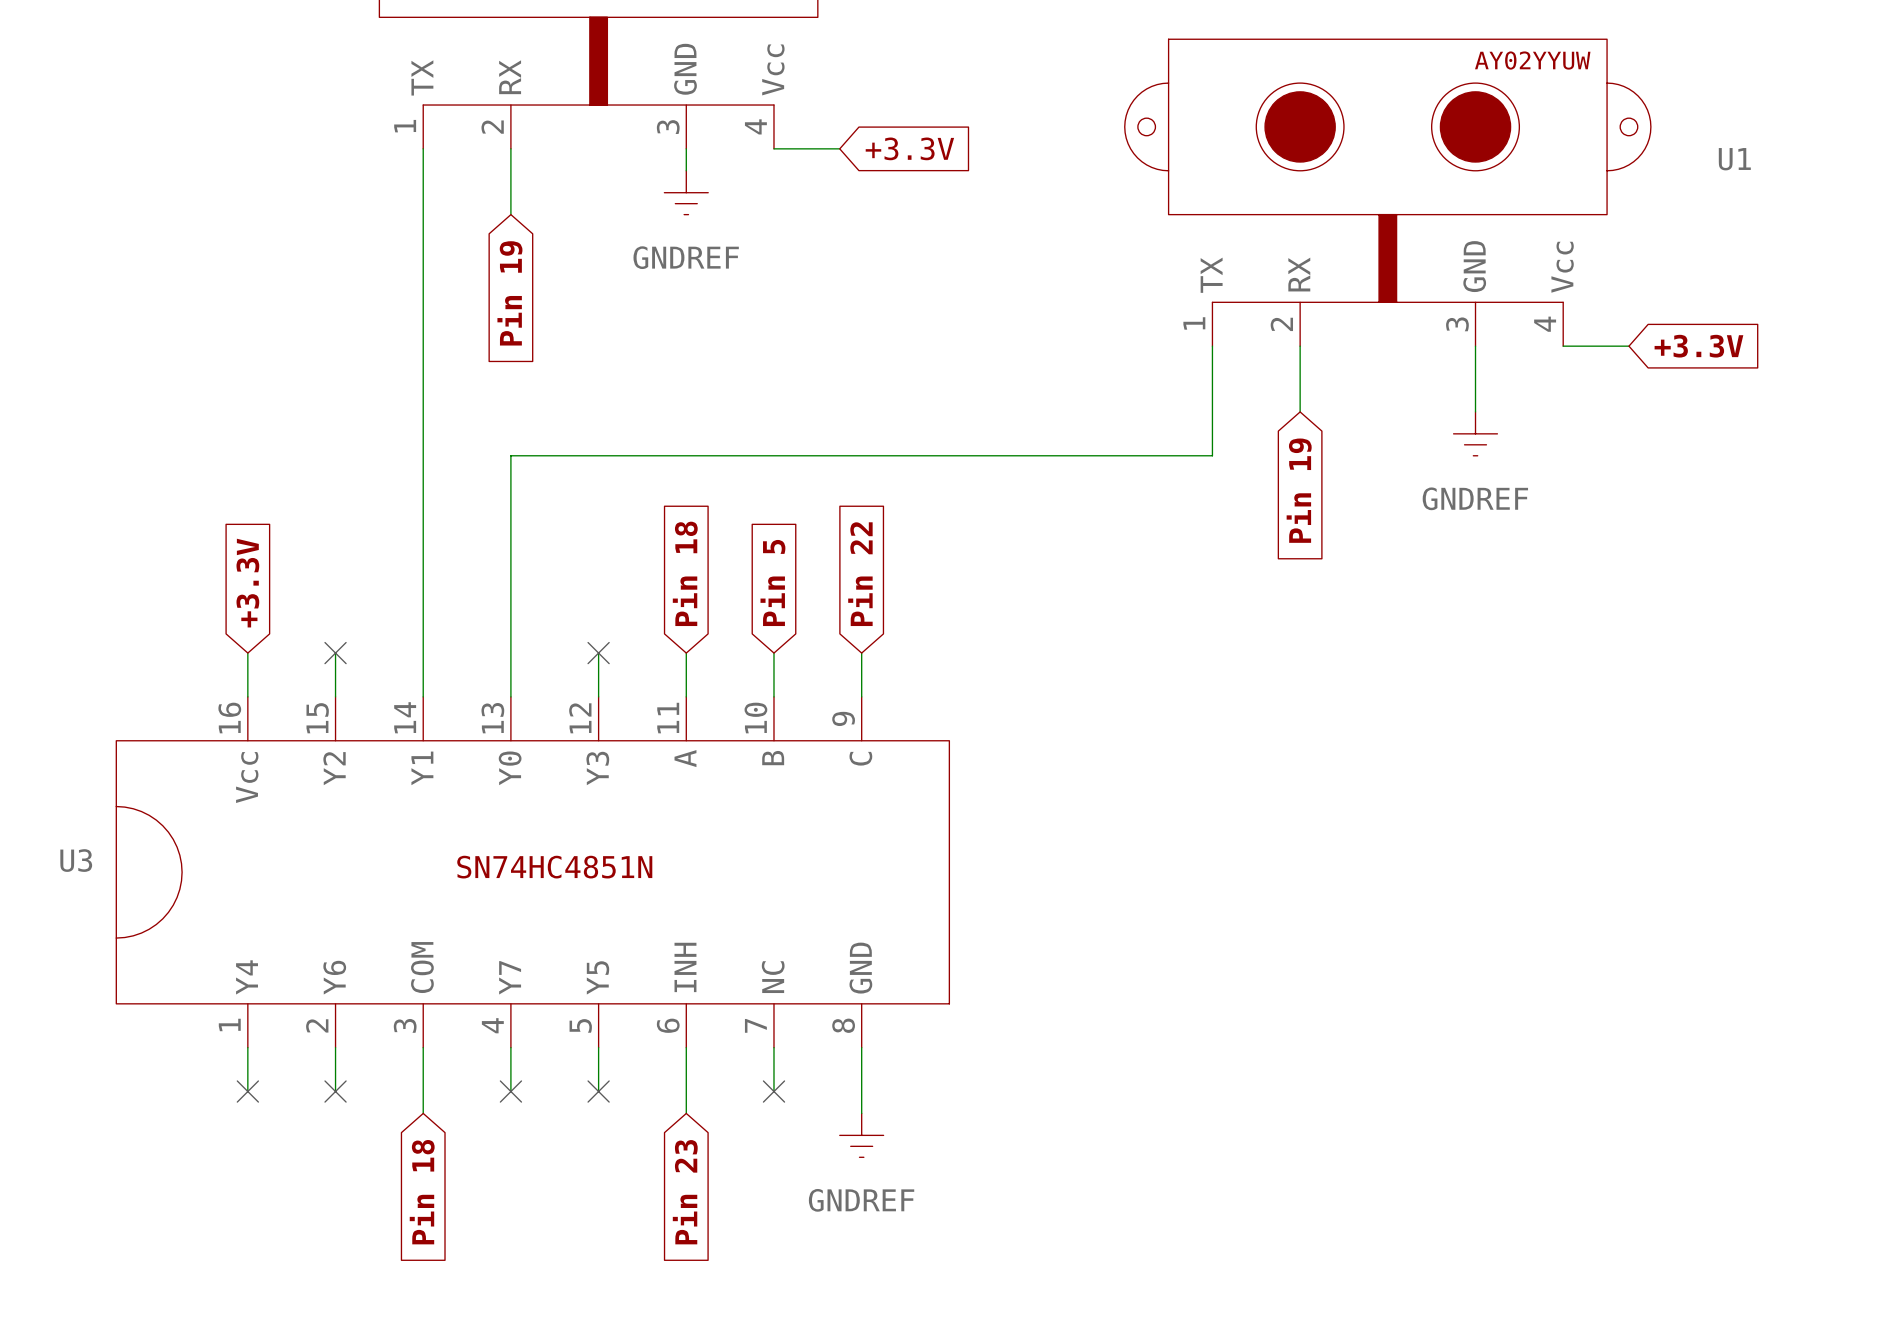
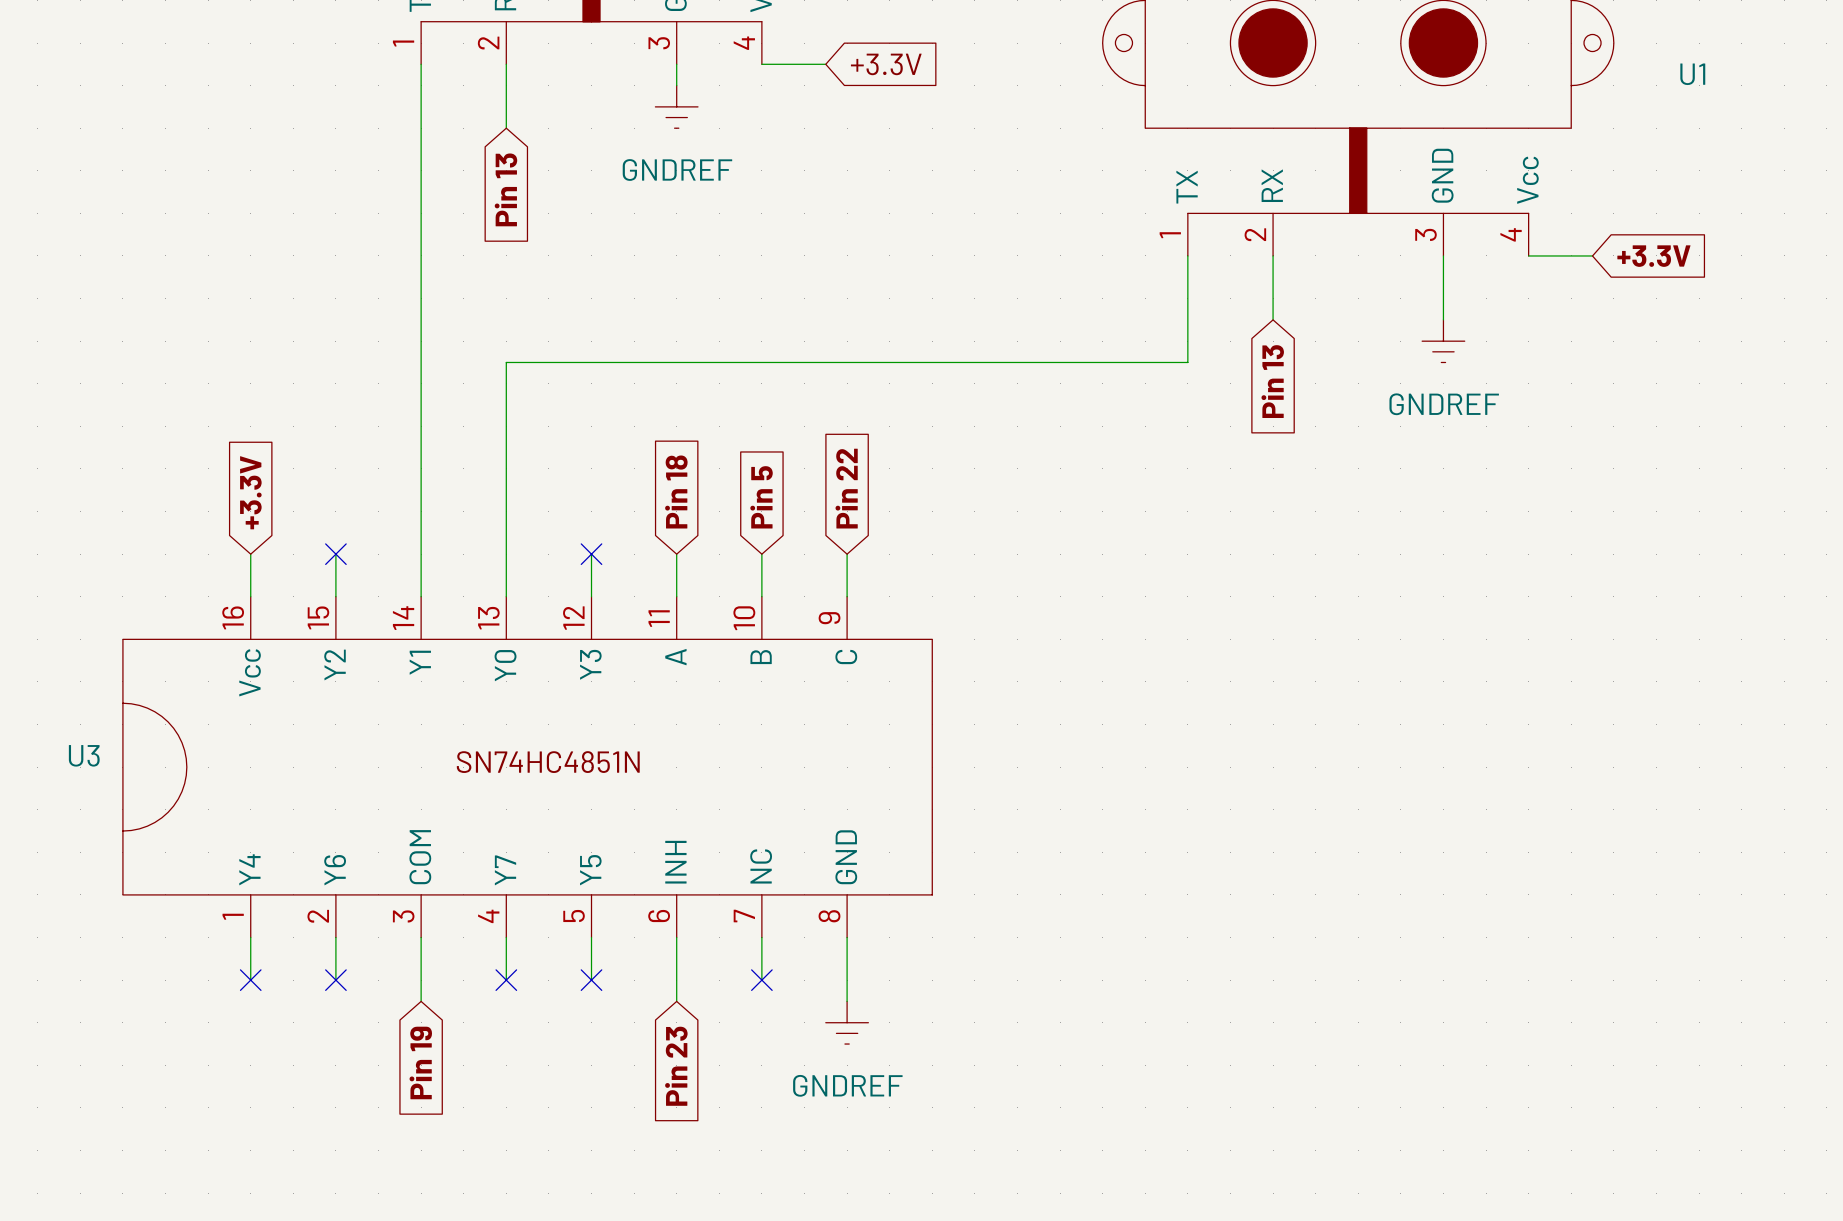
global label: Pin 19 (509, 293) -> Pin 13 (505, 189)
global label: Pin 19 (1299, 490) -> Pin 13 (1272, 381)
global label: Pin 18 (422, 1192) -> Pin 19 (420, 1062)

